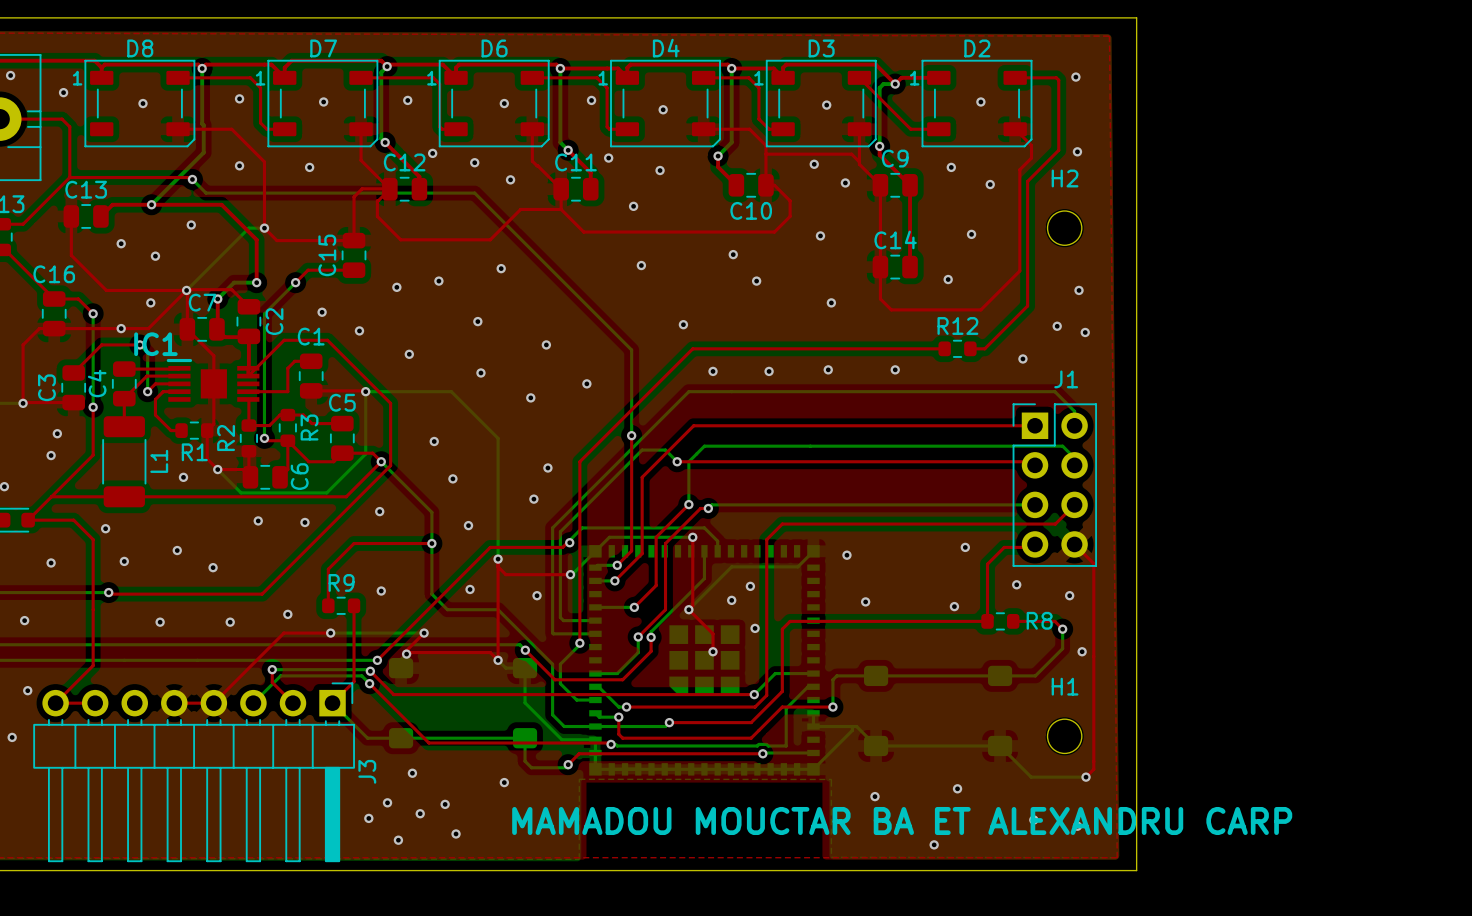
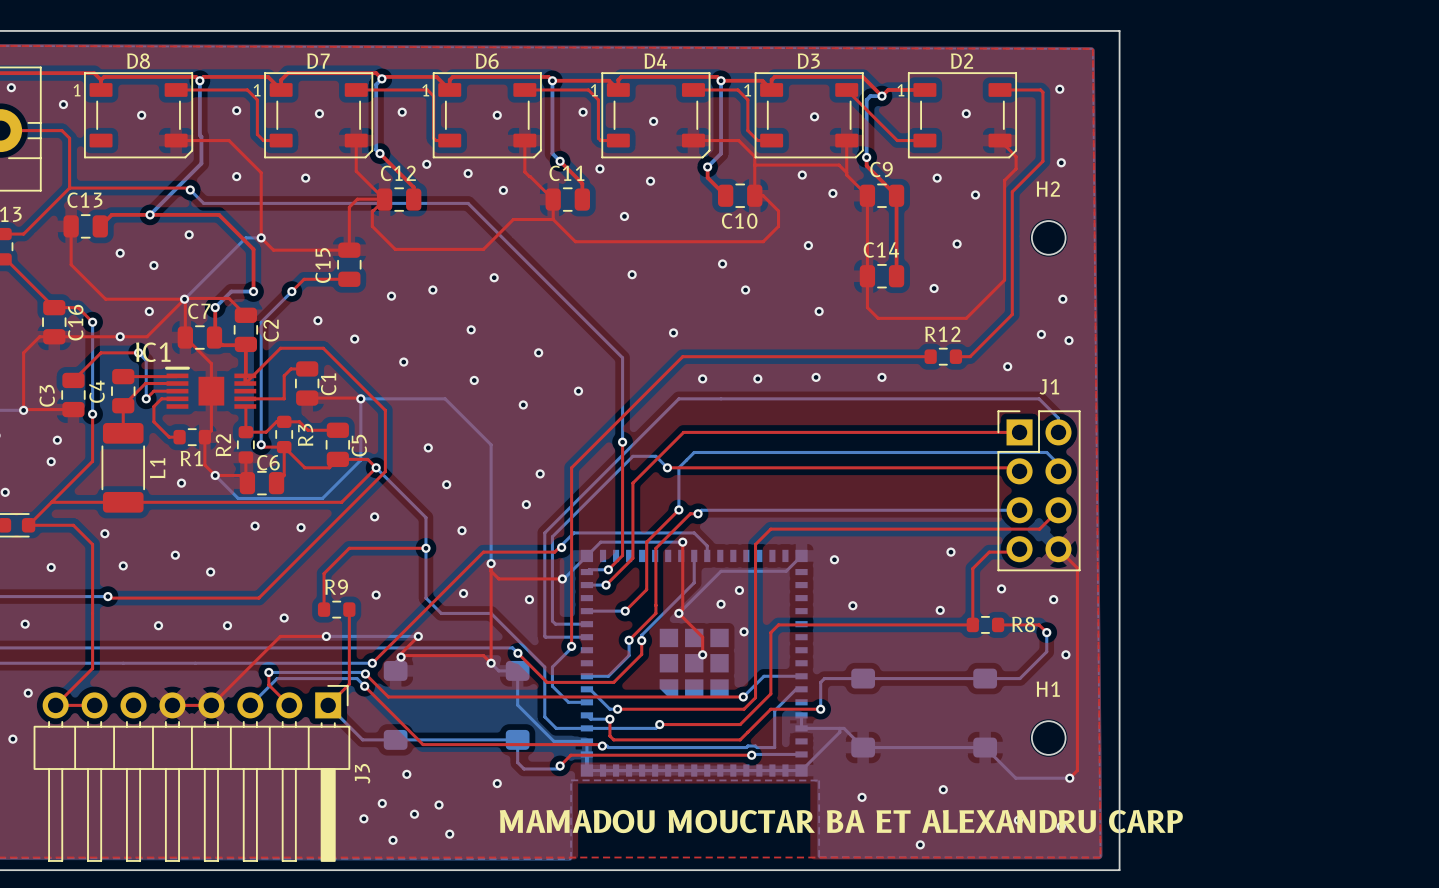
C16 name rotation: 0° (54, 274) -> 90° counterclockwise (75, 322)
C1 name rotation: 0° (311, 336) -> 90° counterclockwise (328, 384)
C1 name position: C1 (311, 336) -> C1 (328, 384)
C5 name rotation: 0° (342, 402) -> 90° counterclockwise (359, 445)
C5 name position: C5 (342, 402) -> C5 (359, 445)
C6 name rotation: 0° (299, 476) -> 90° clockwise (268, 462)

